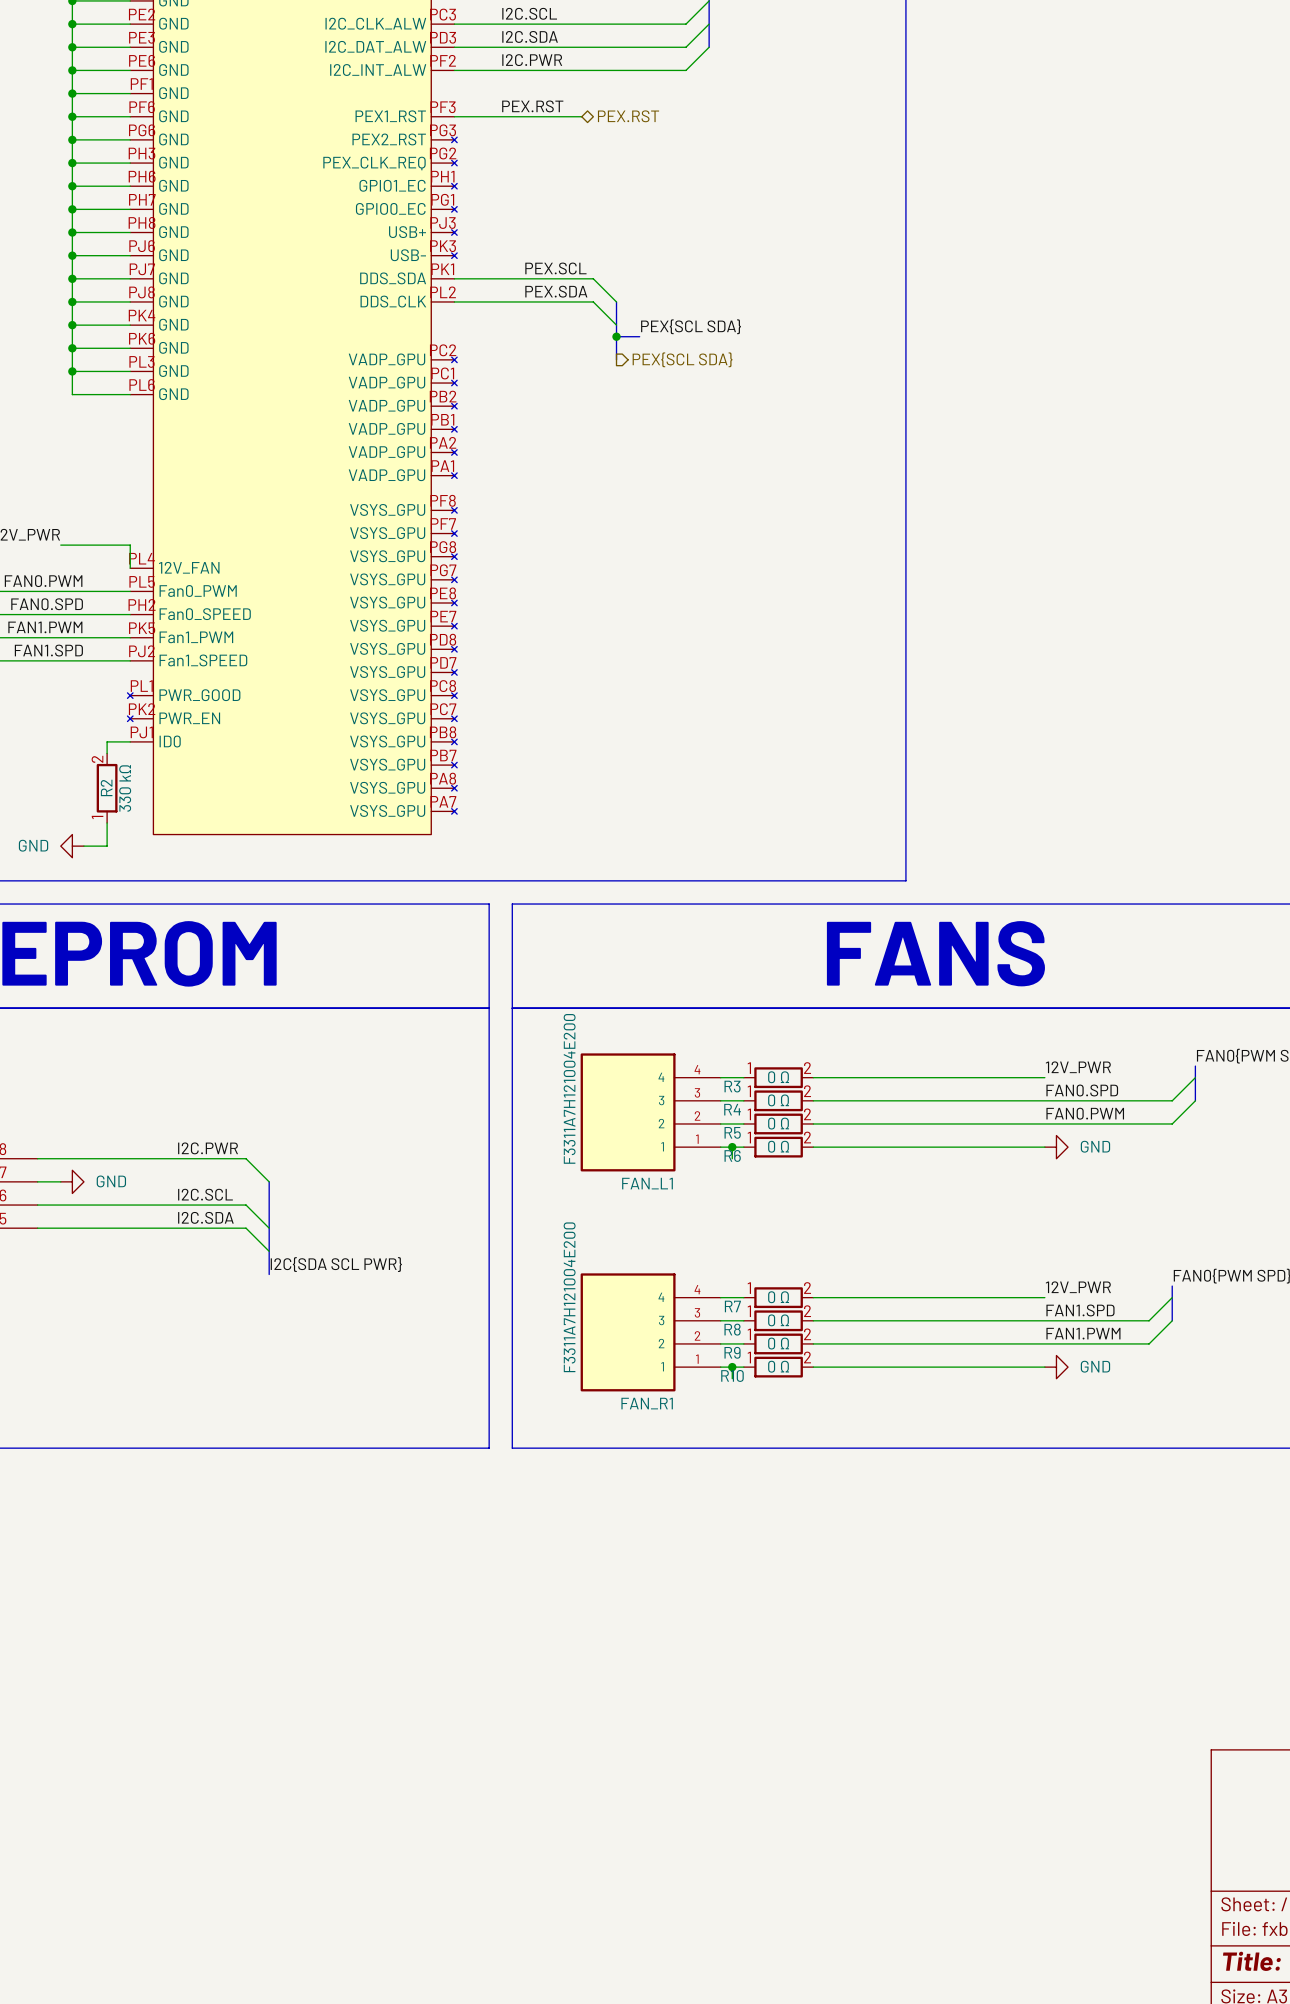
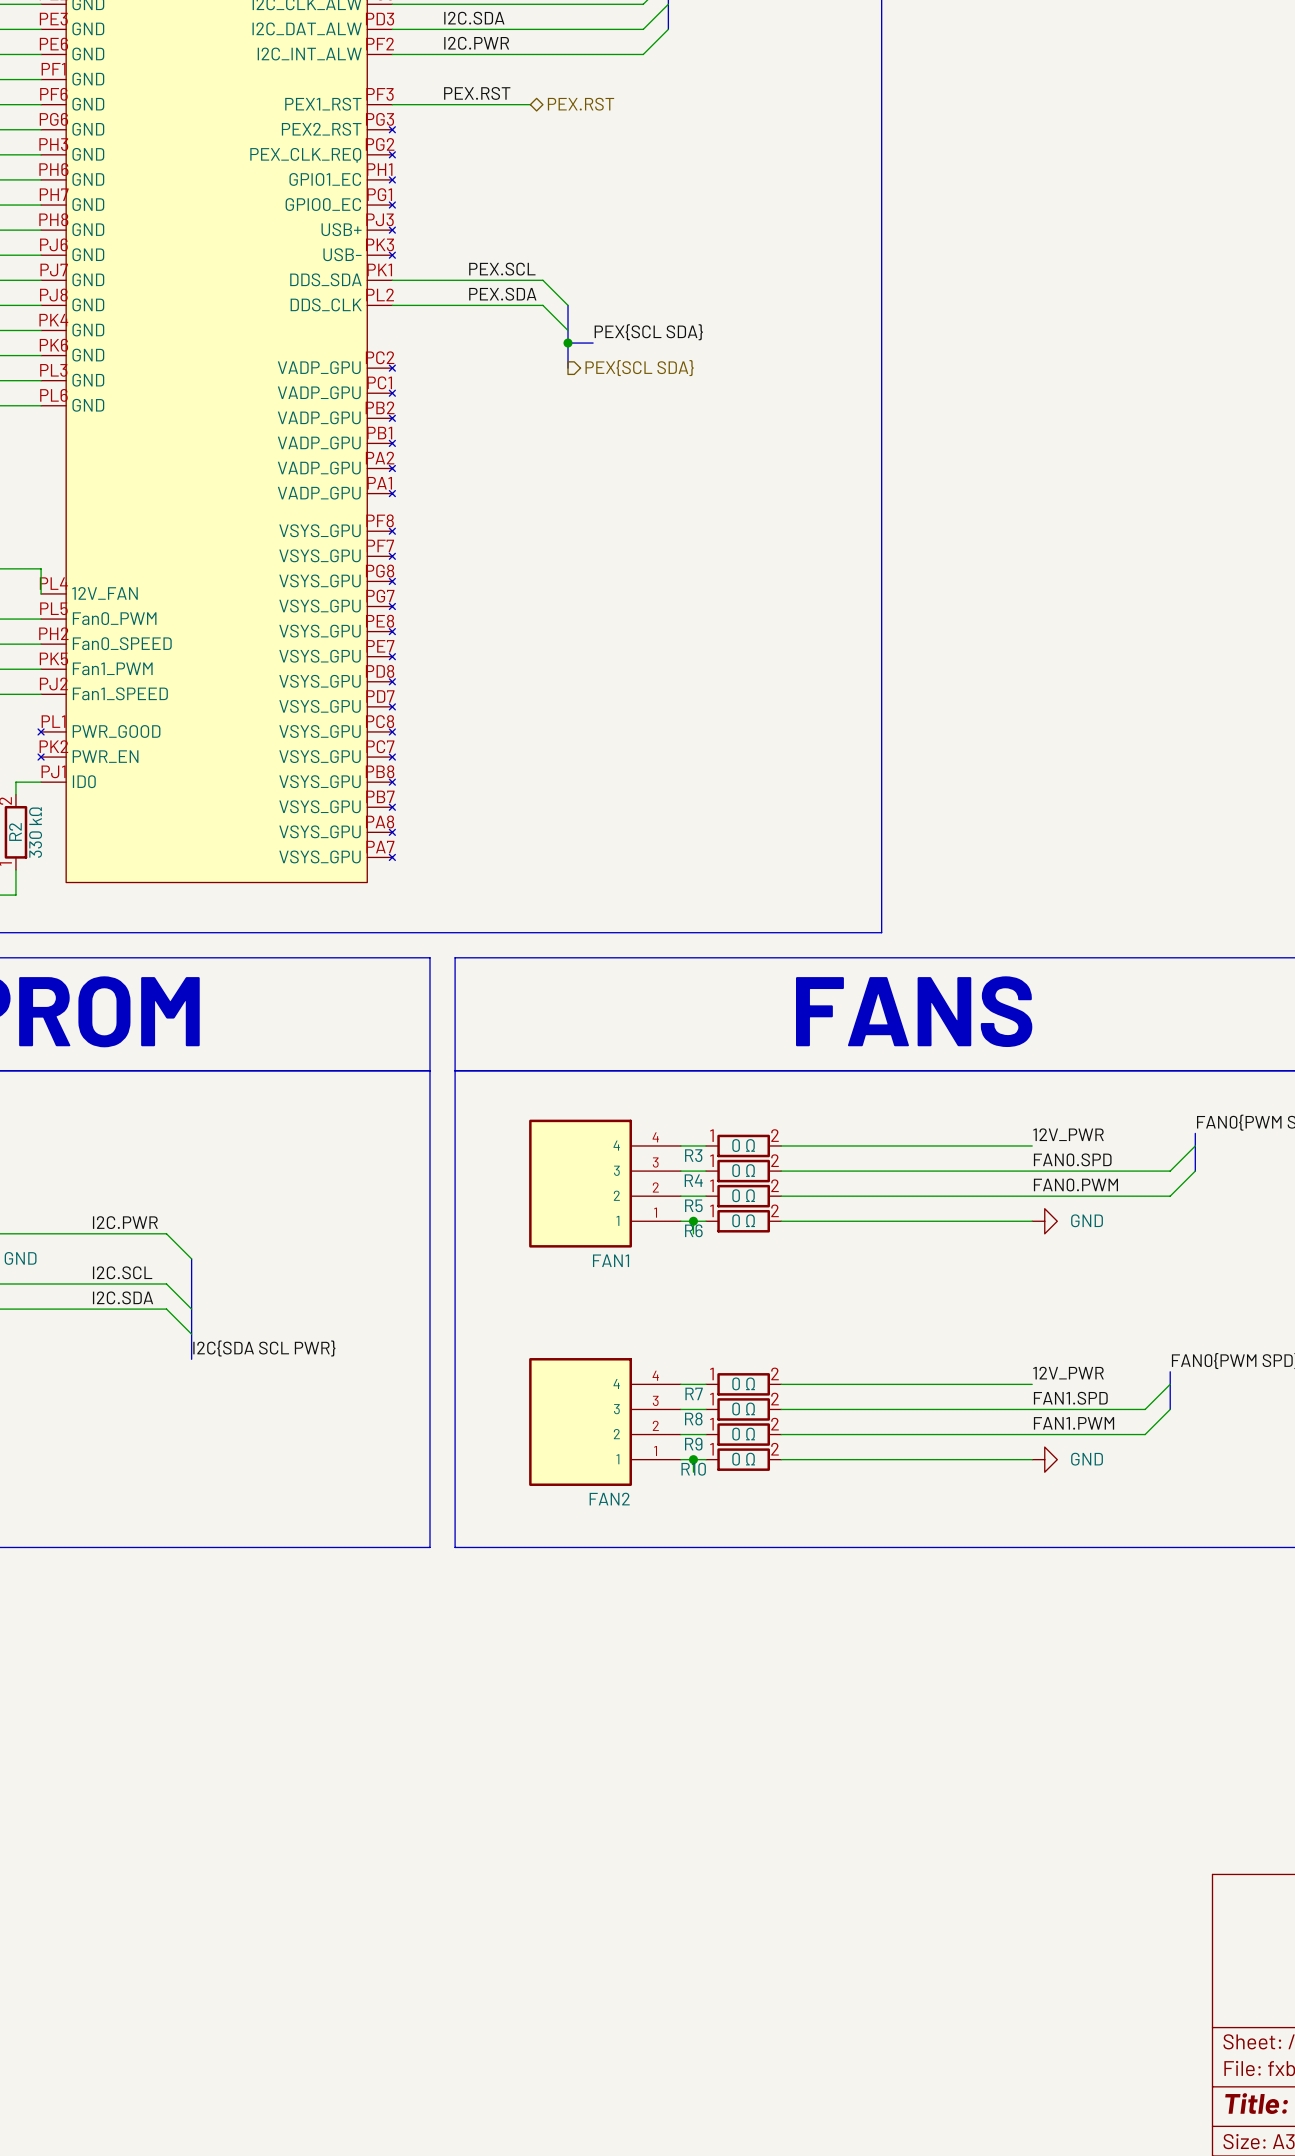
FAN_L1 value: F3311A7H121004E200 (569, 1088) -> none
FAN_L1 name: FAN_L1 (647, 1183) -> FAN1 (611, 1260)
FAN_R1 value: F3311A7H121004E200 (569, 1297) -> none
FAN_R1 name: FAN_R1 (647, 1403) -> FAN2 (609, 1499)

